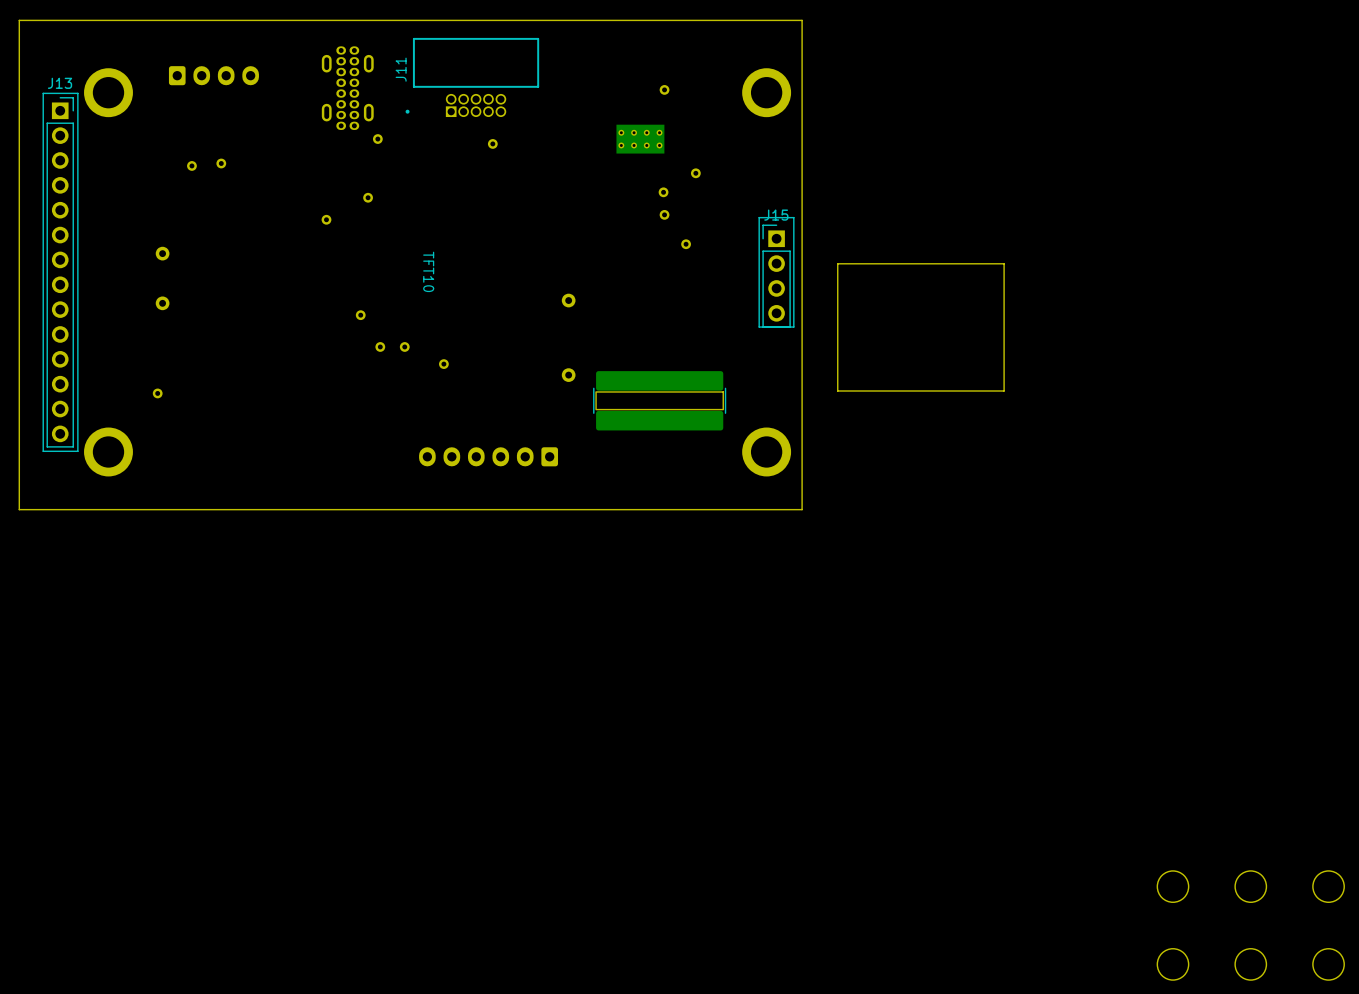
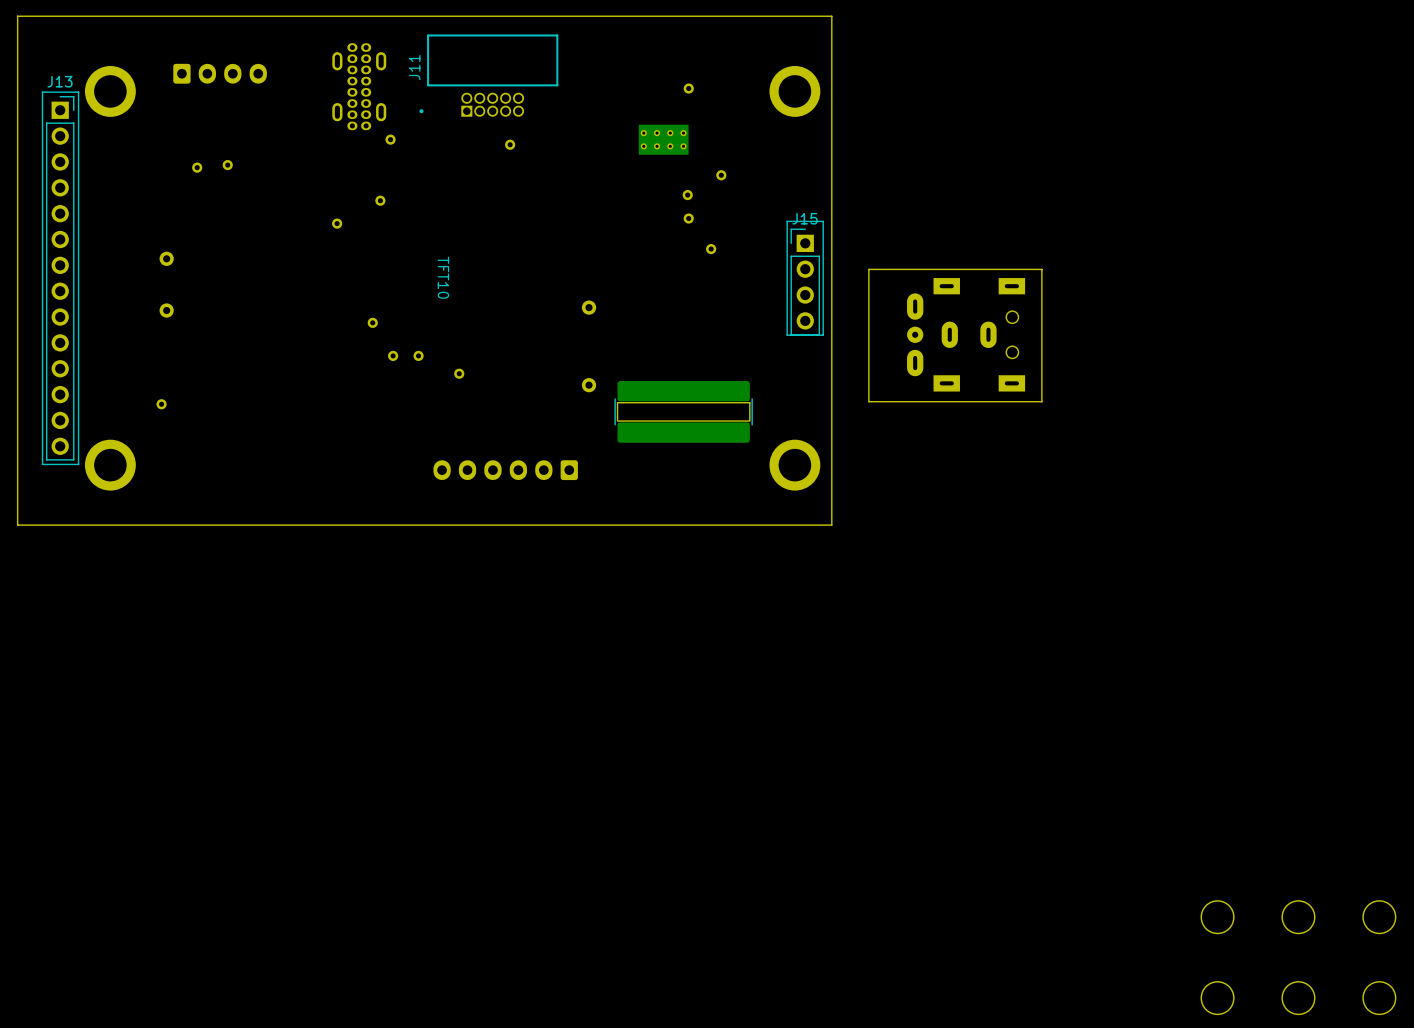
part: none -> (966, 334)

